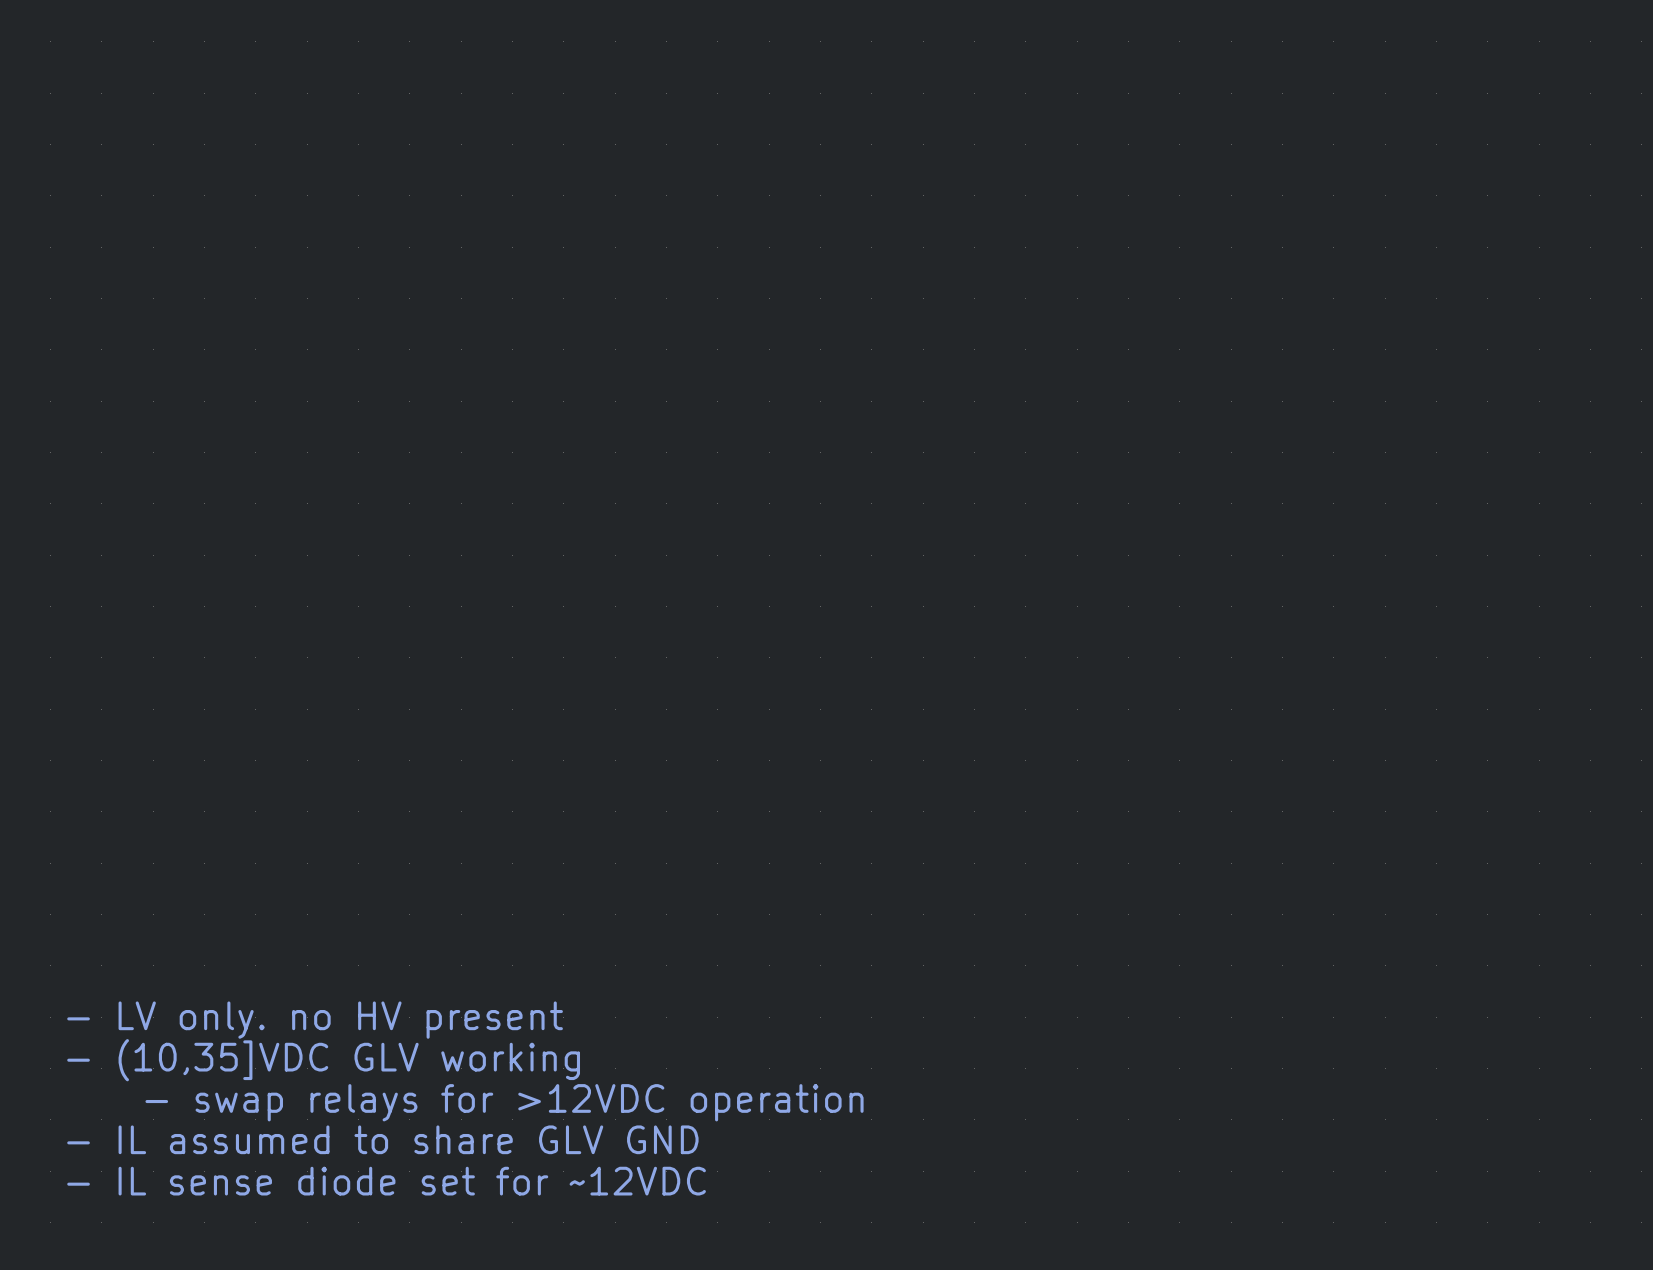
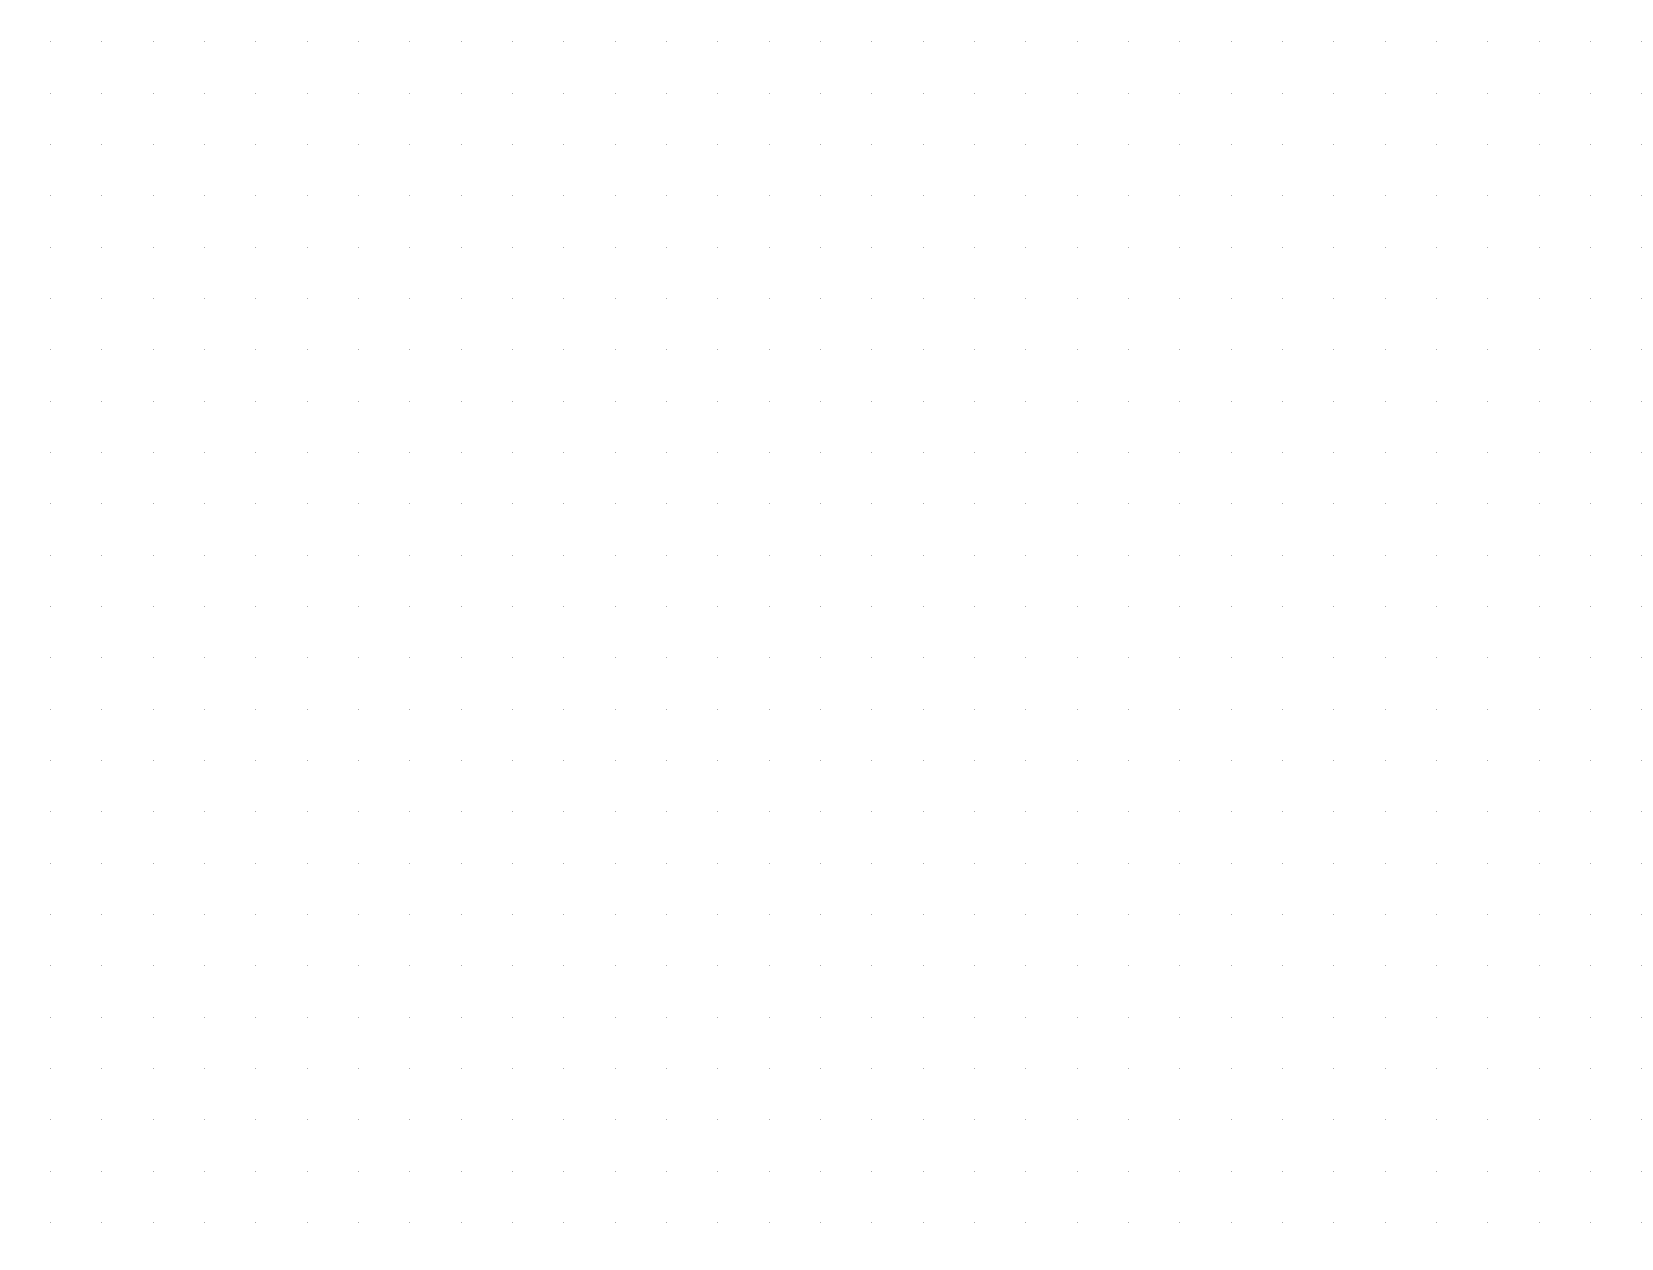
text: - LV only. no HV present (315, 1020) -> none
text: - (10,35]VDC GLV working (323, 1060) -> none
text: - swap relays for >12VDC operation (504, 1102) -> none
text: - IL assumed to share GLV GND (382, 1139) -> none
text: - IL sense diode set for ~12VDC (386, 1181) -> none

